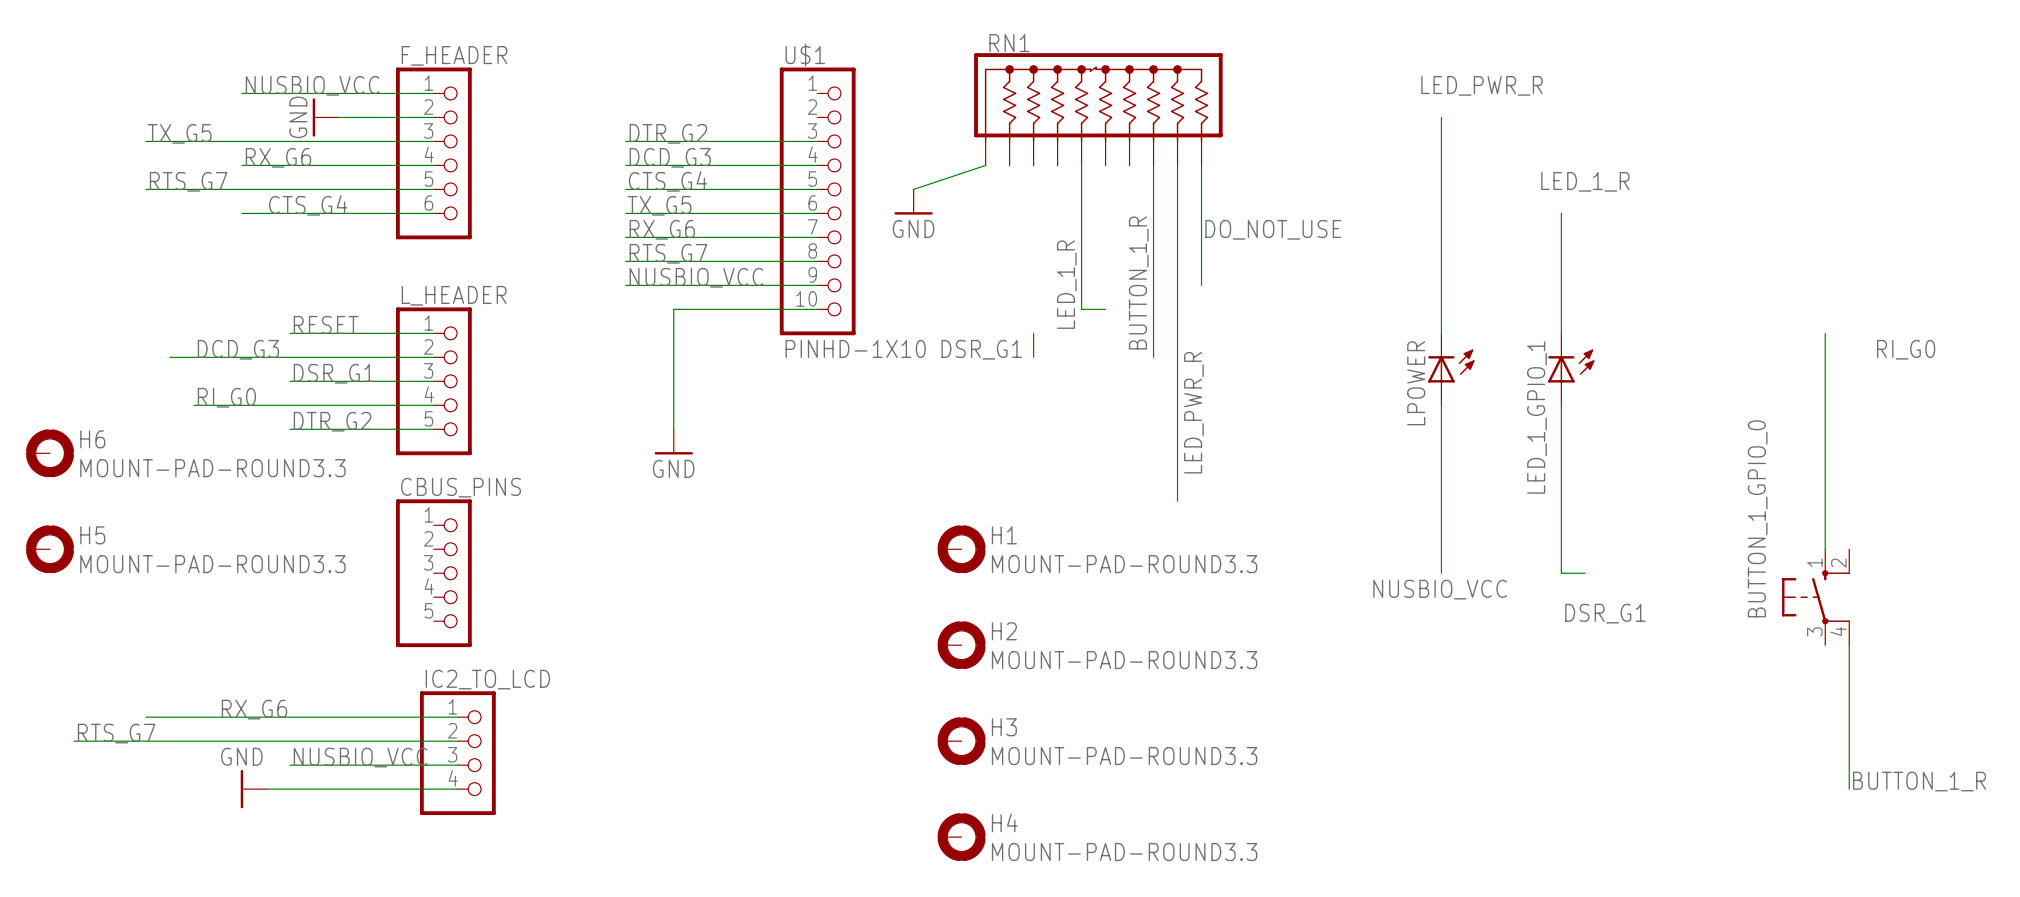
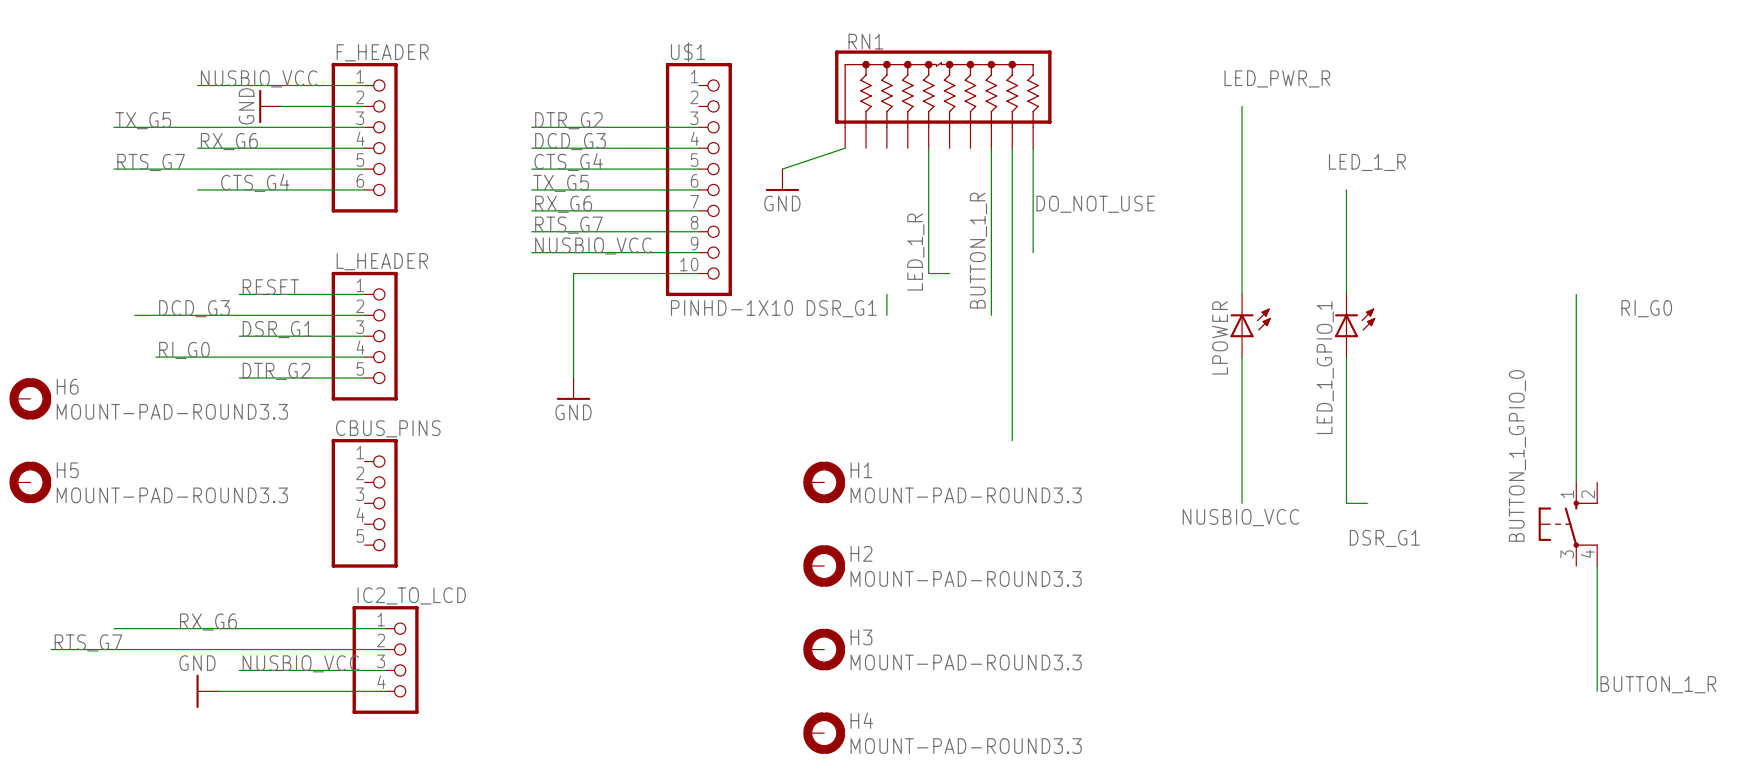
label: LED_PWR_R (1193, 412) -> none

